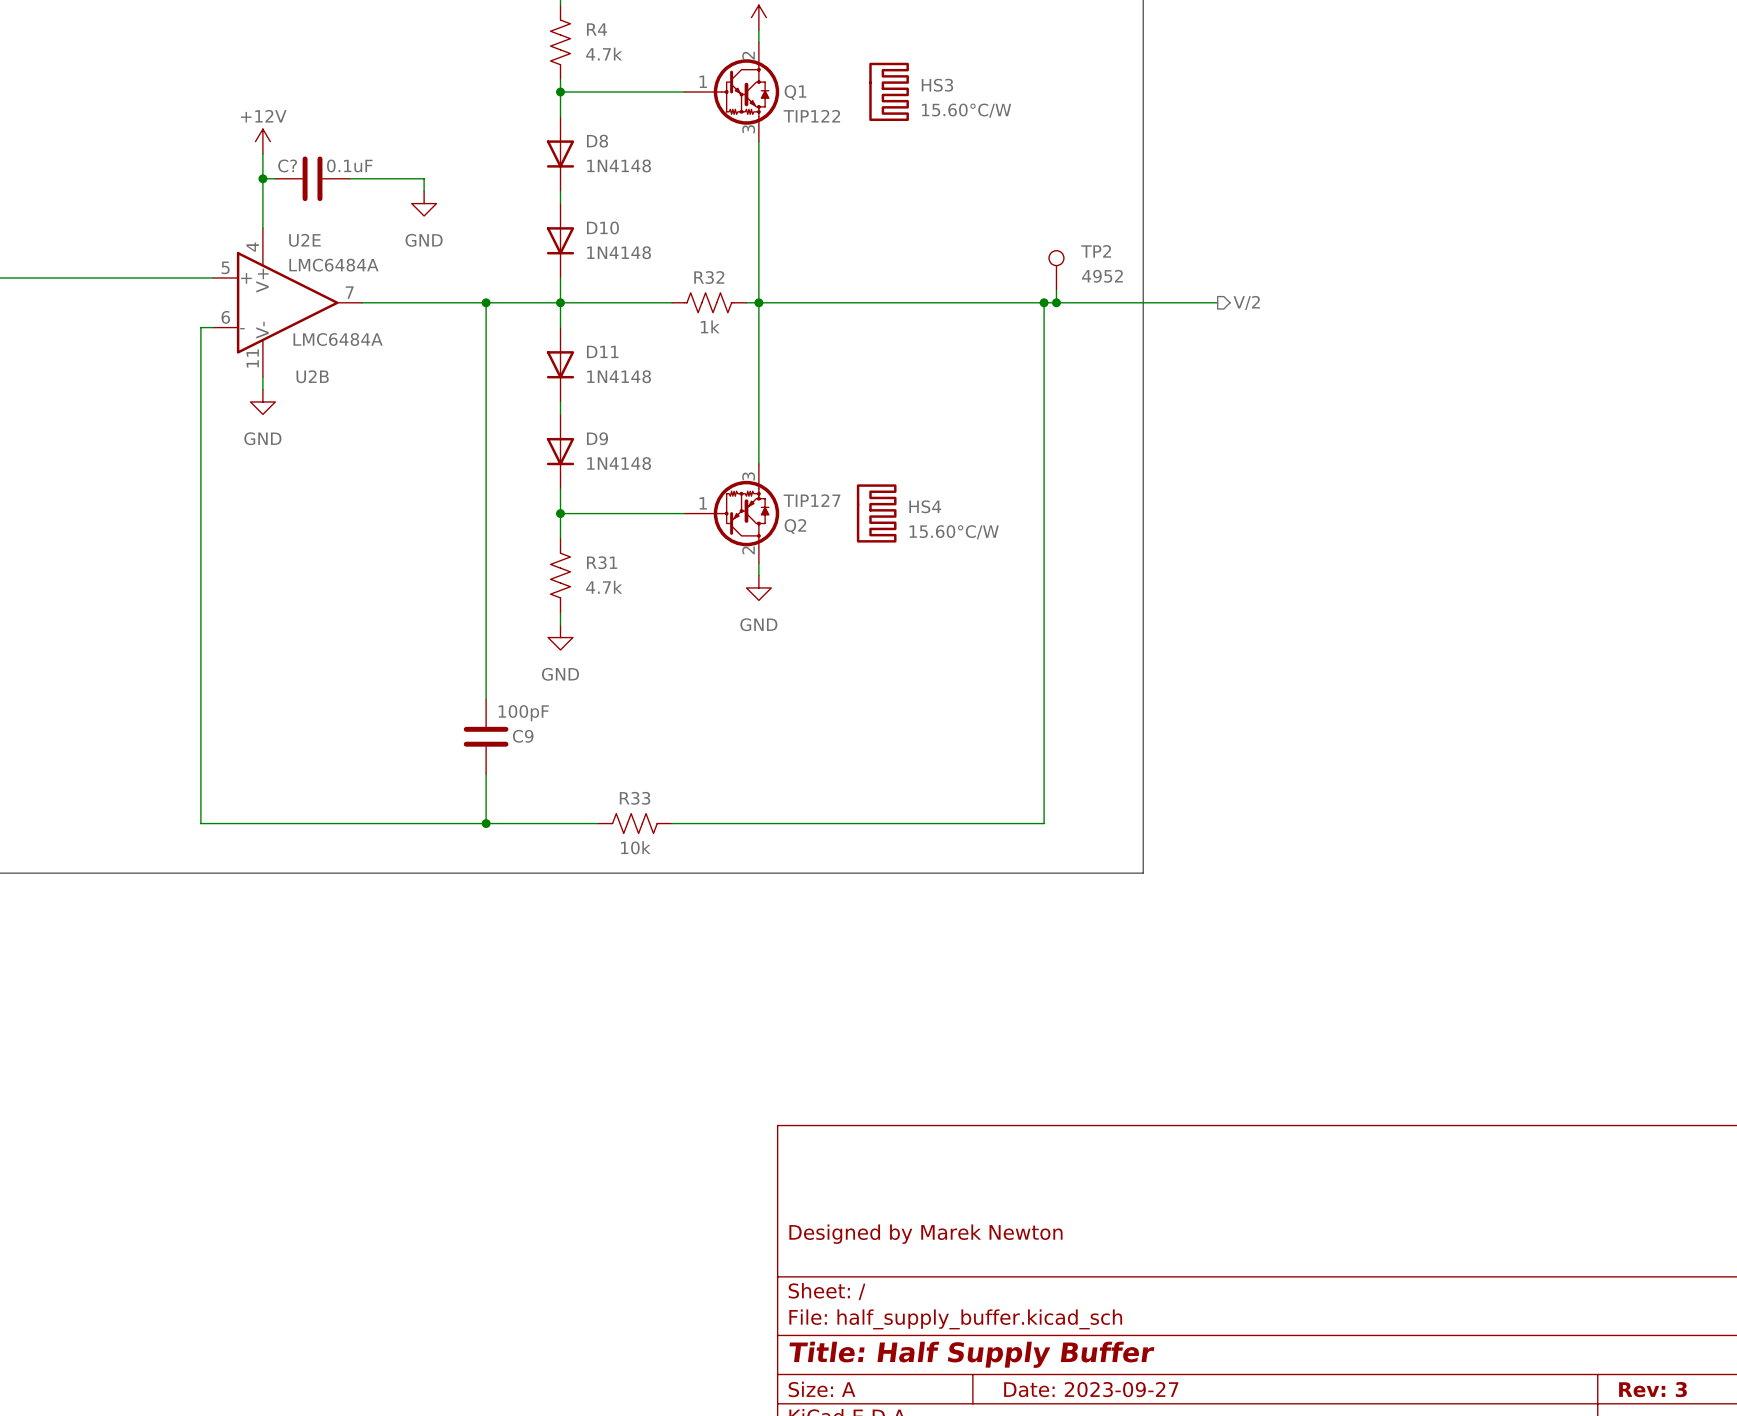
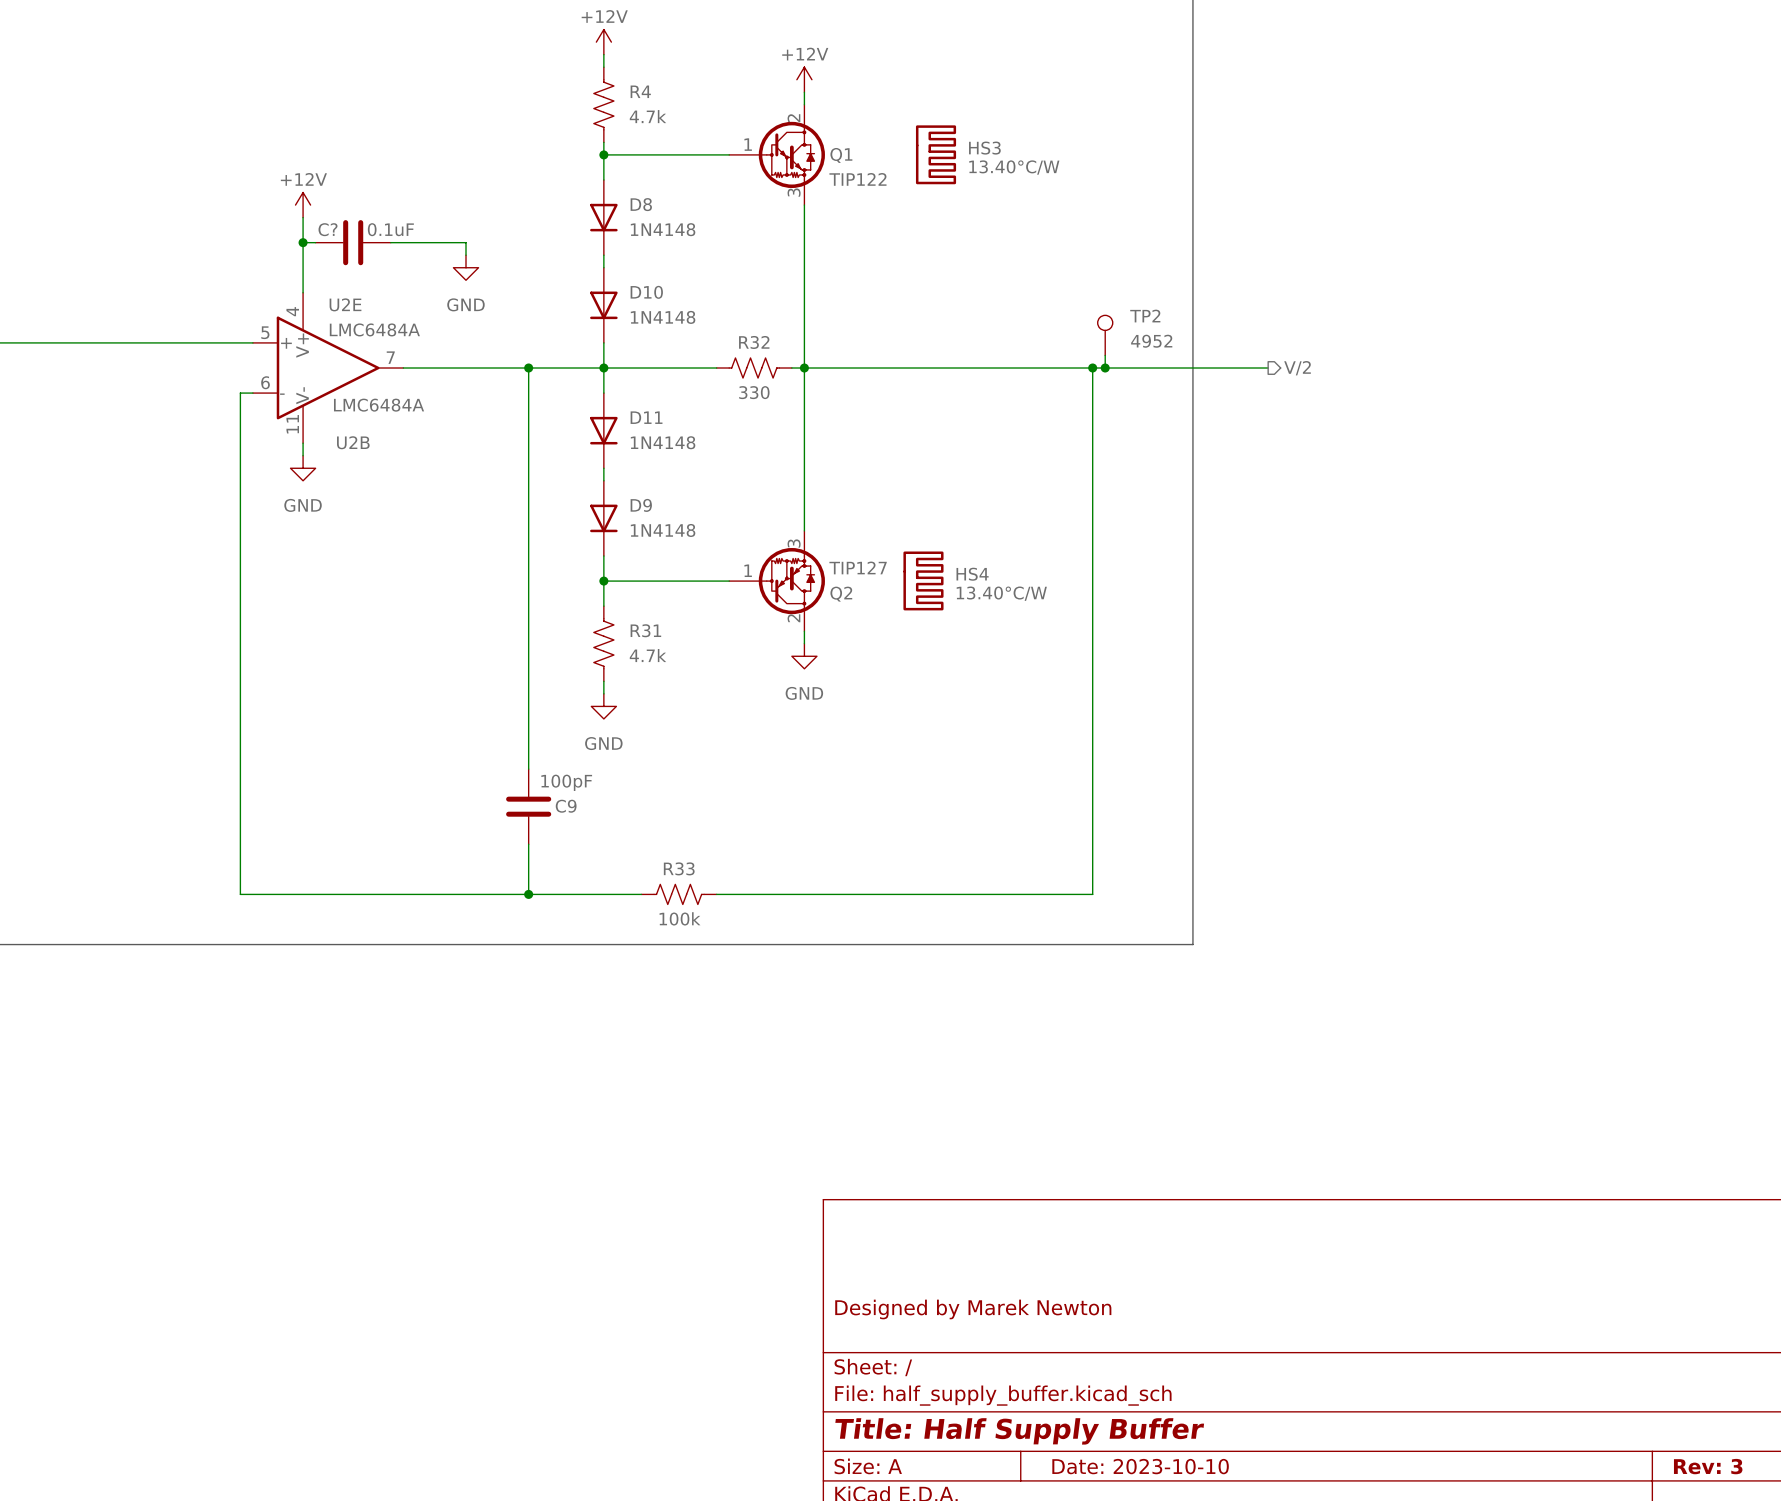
HS3 value: 15.60°C/W (966, 110) -> 13.40°C/W (1014, 167)
R32 value: 1k (710, 326) -> 330 (754, 392)
HS4 value: 15.60°C/W (954, 532) -> 13.40°C/W (1001, 593)
R33 value: 10k (635, 847) -> 100k (679, 918)
title block: Date: 2023-09-27 (1091, 1389) -> Date: 2023-10-10 (1140, 1466)

